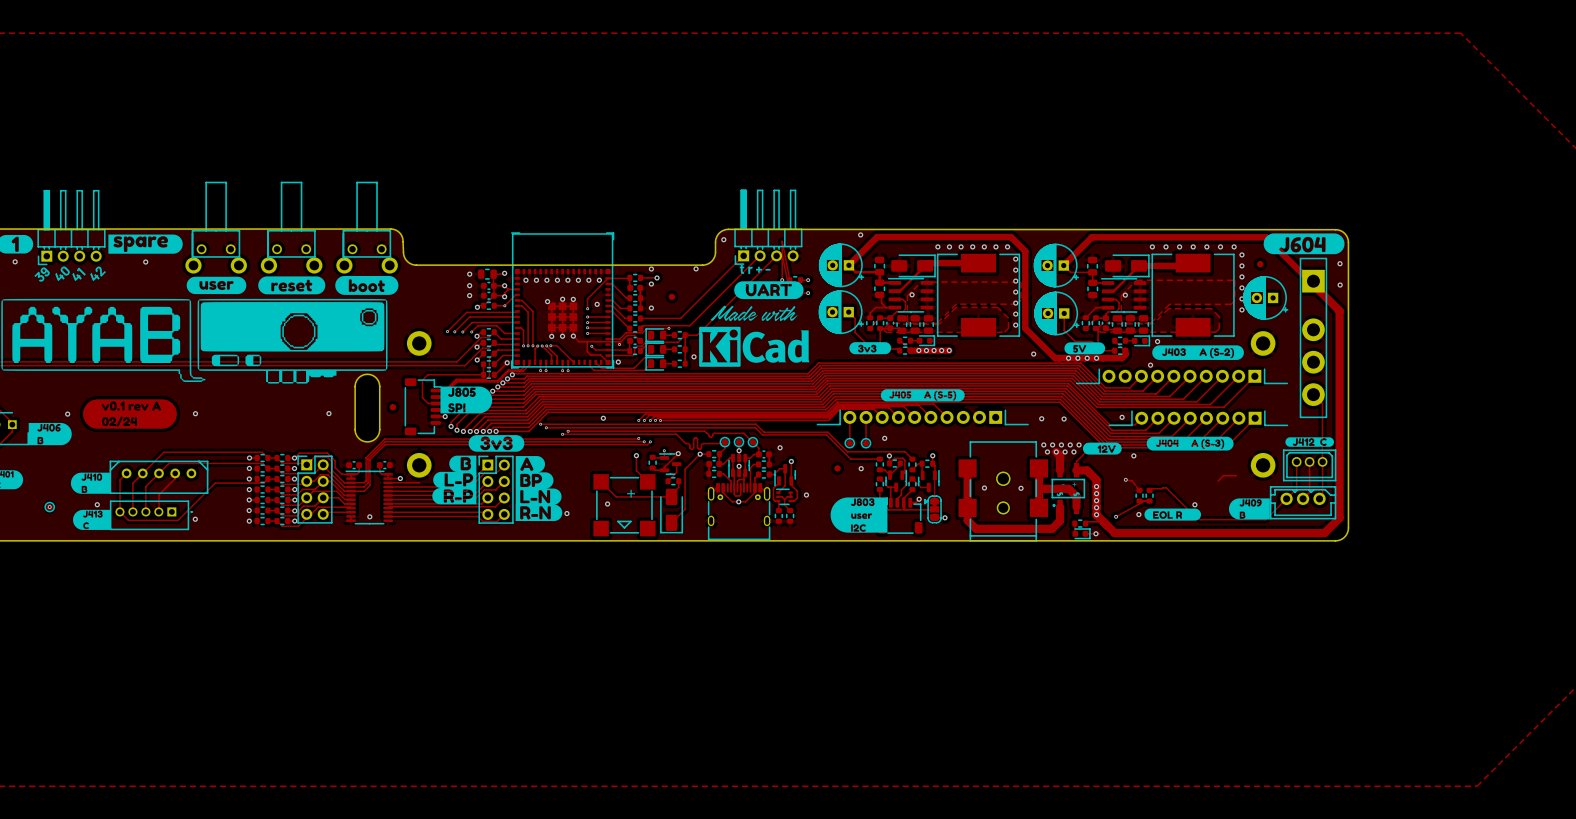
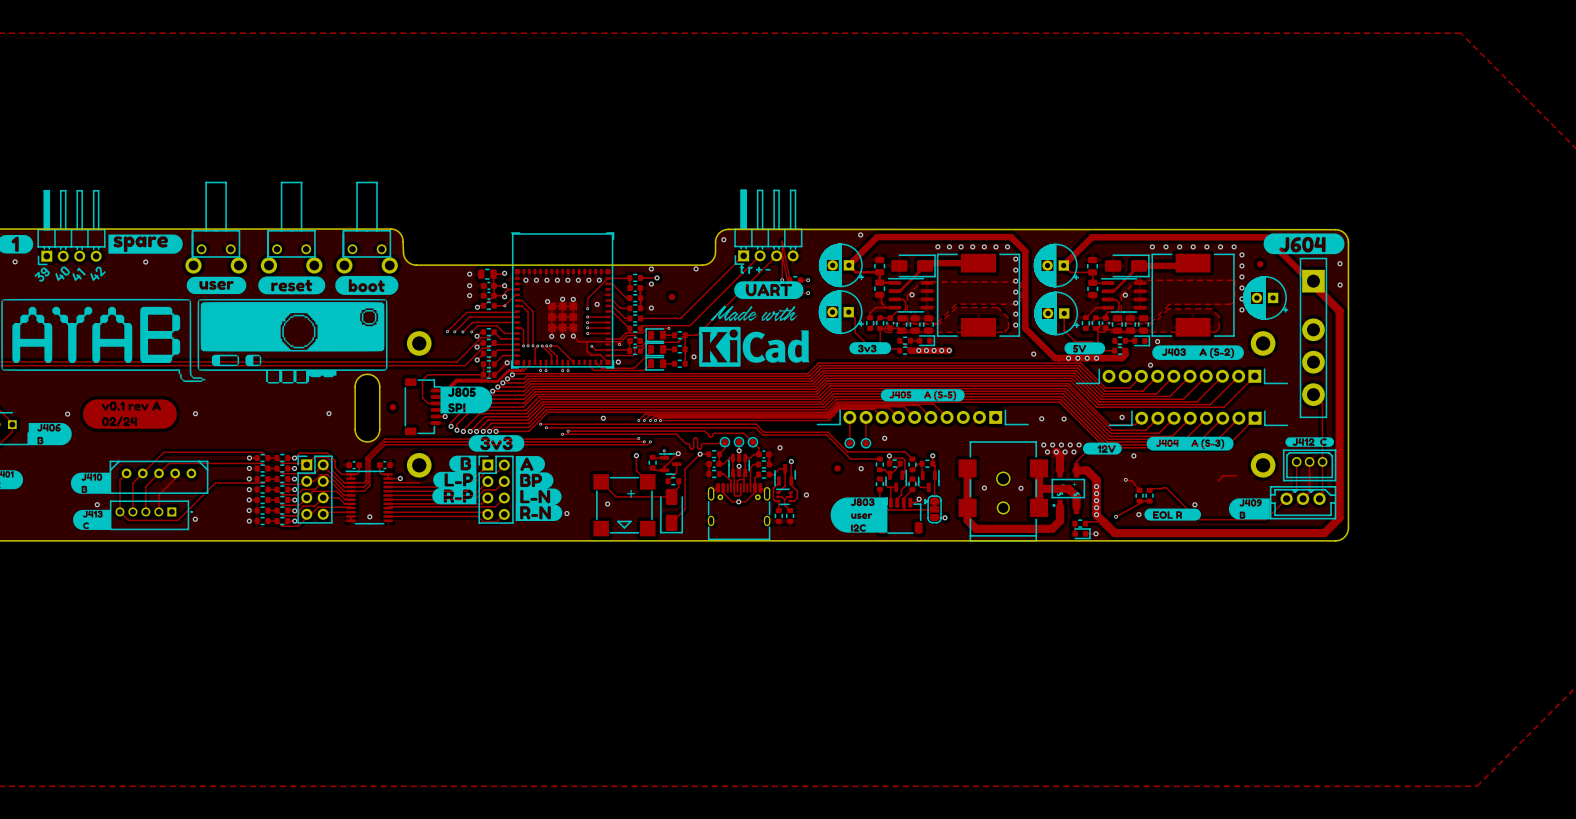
part: (49, 507) -> none
via: (49, 507) -> none

